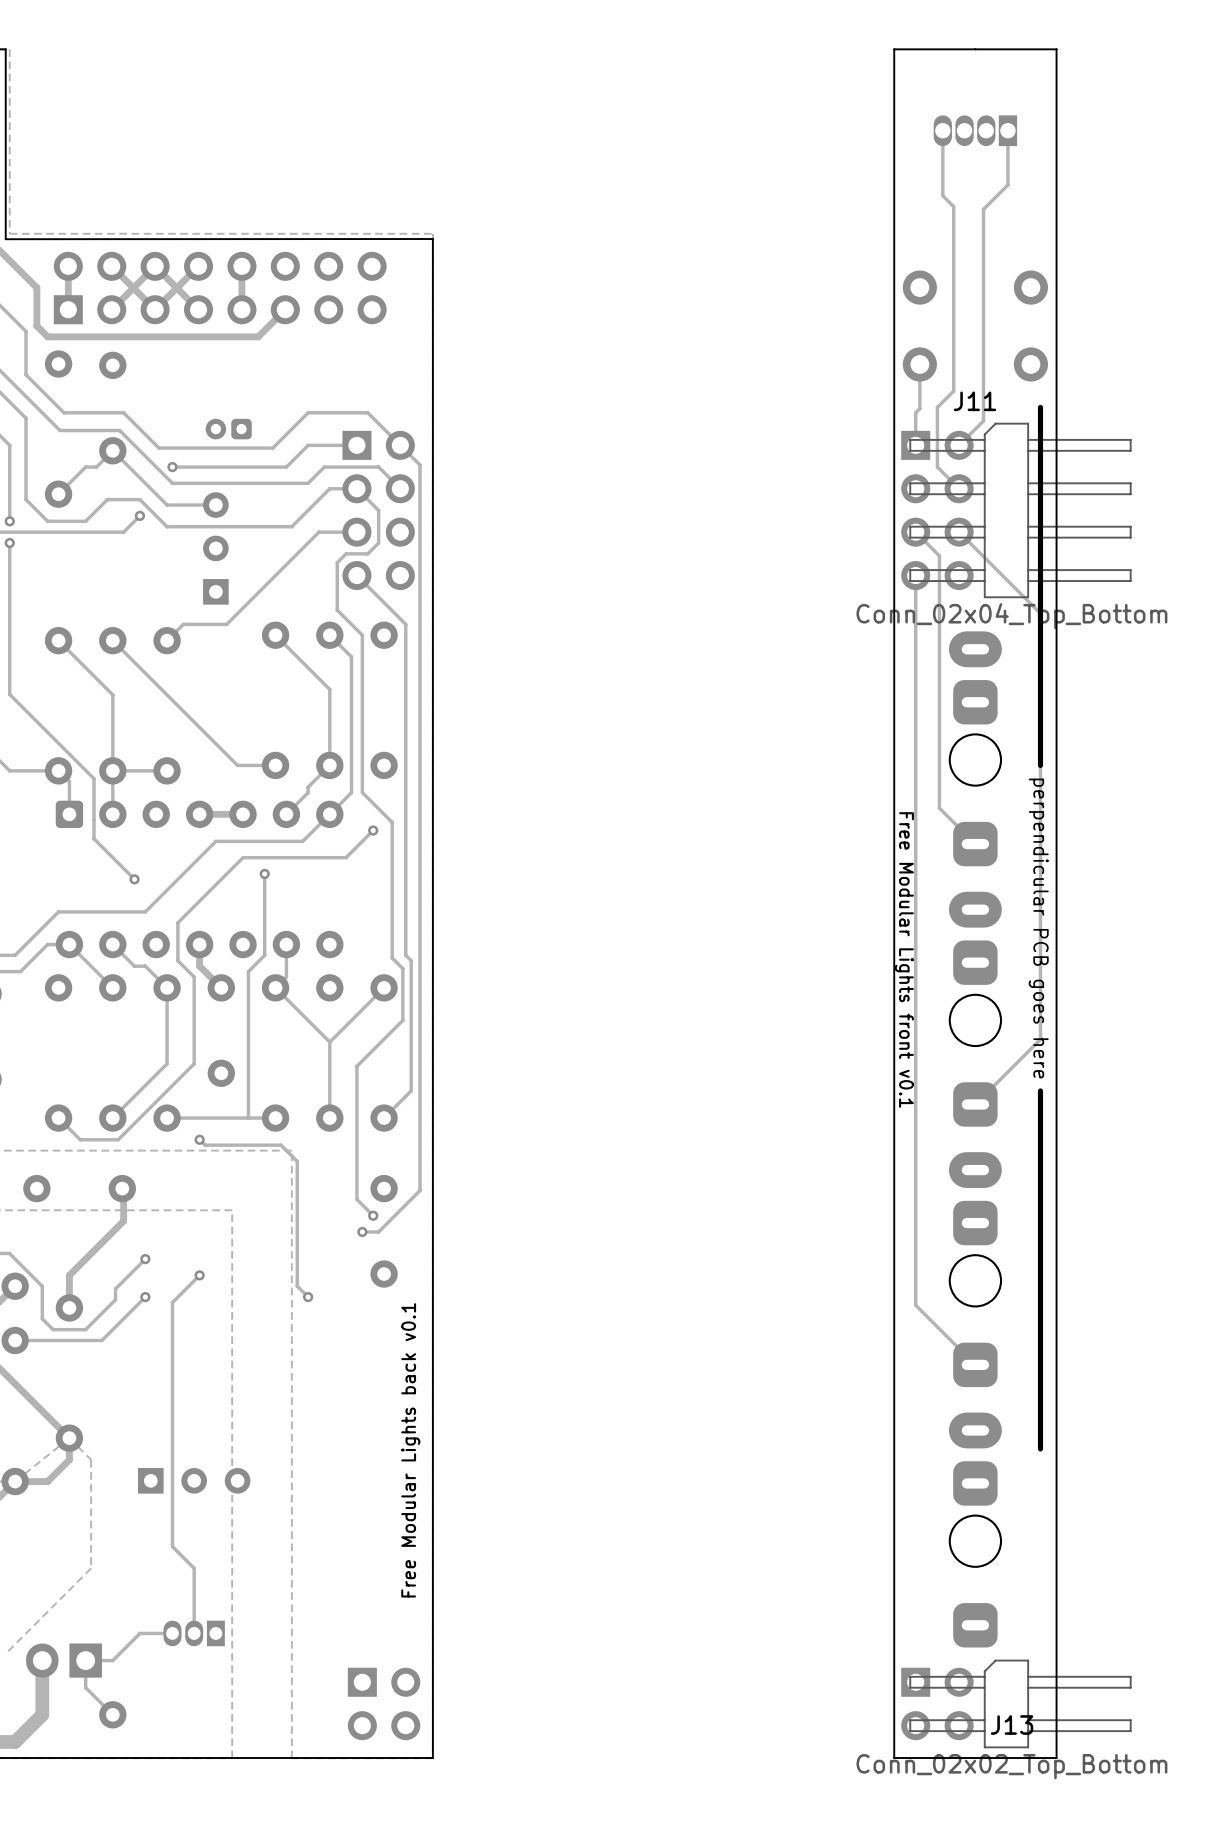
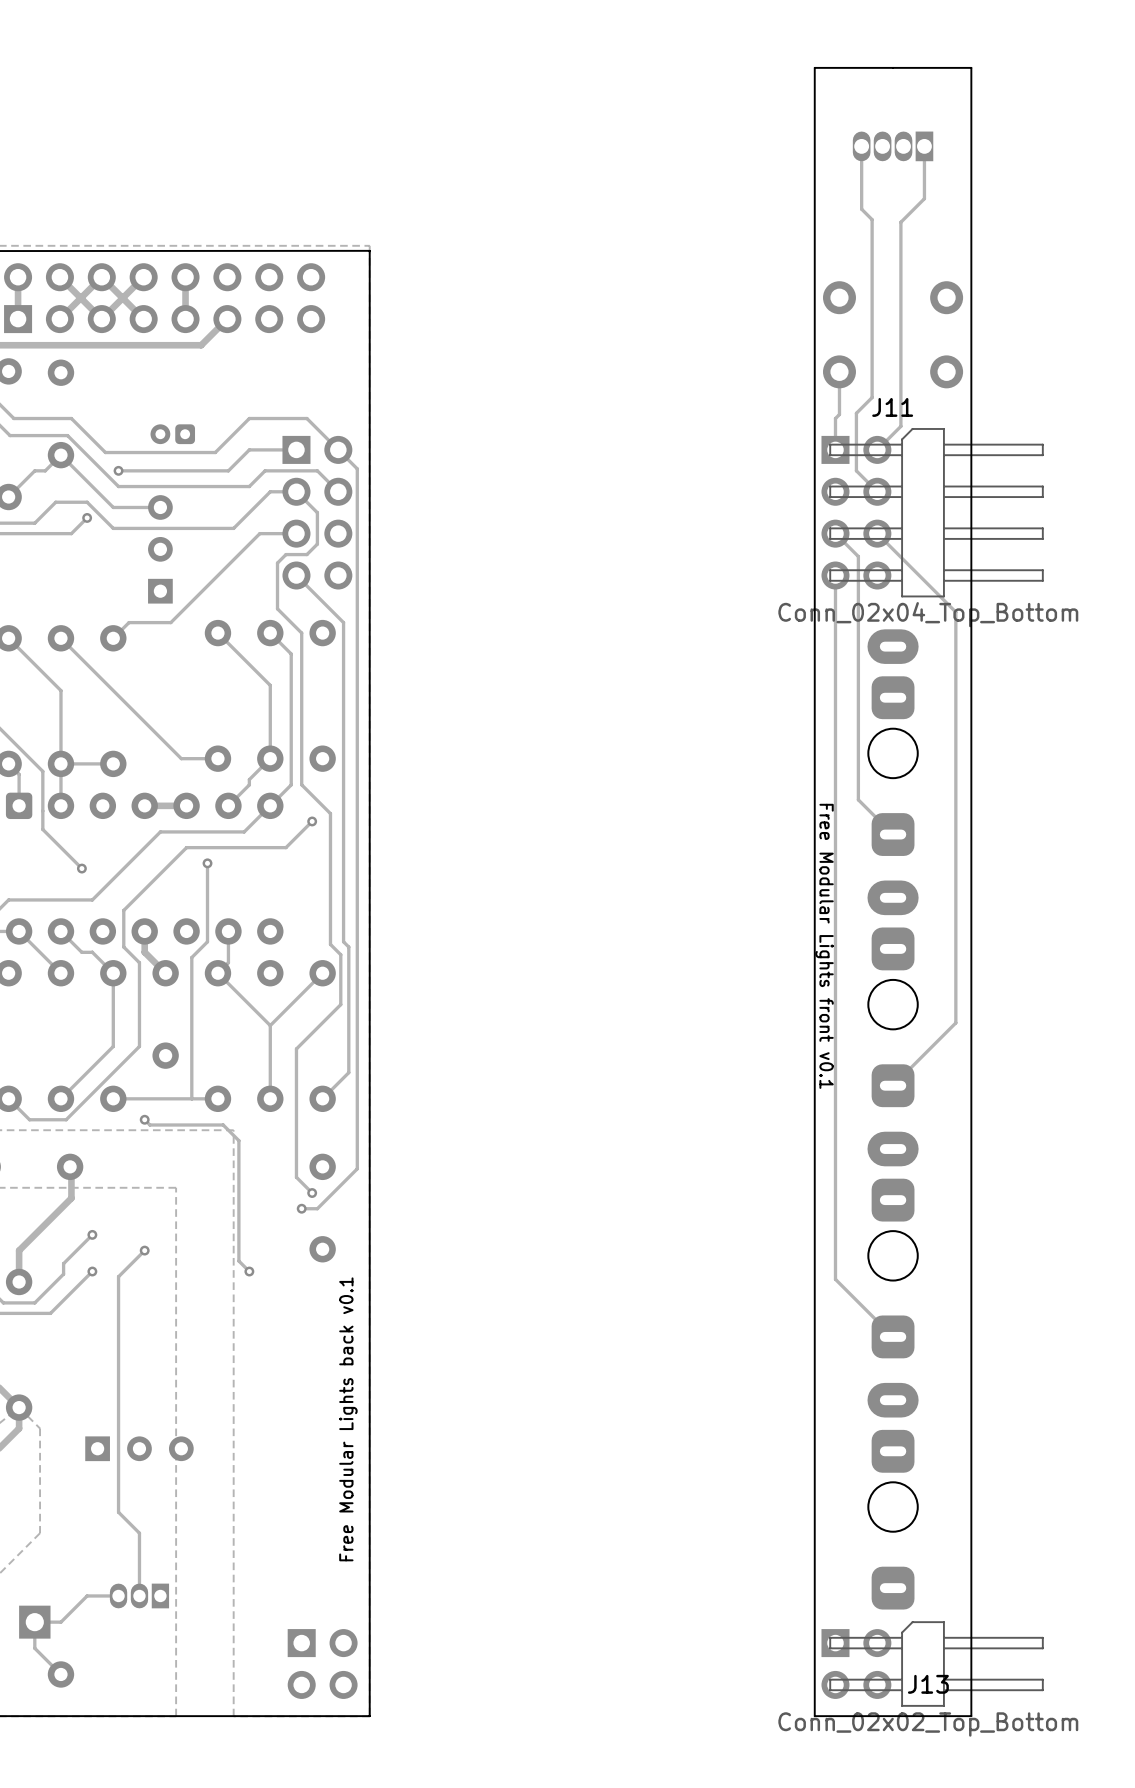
line: (1040, 407) (1040, 765) -> none
text: perpendicular PCB goes here (1038, 928) -> none
line: (1040, 1090) (1040, 1448) -> none

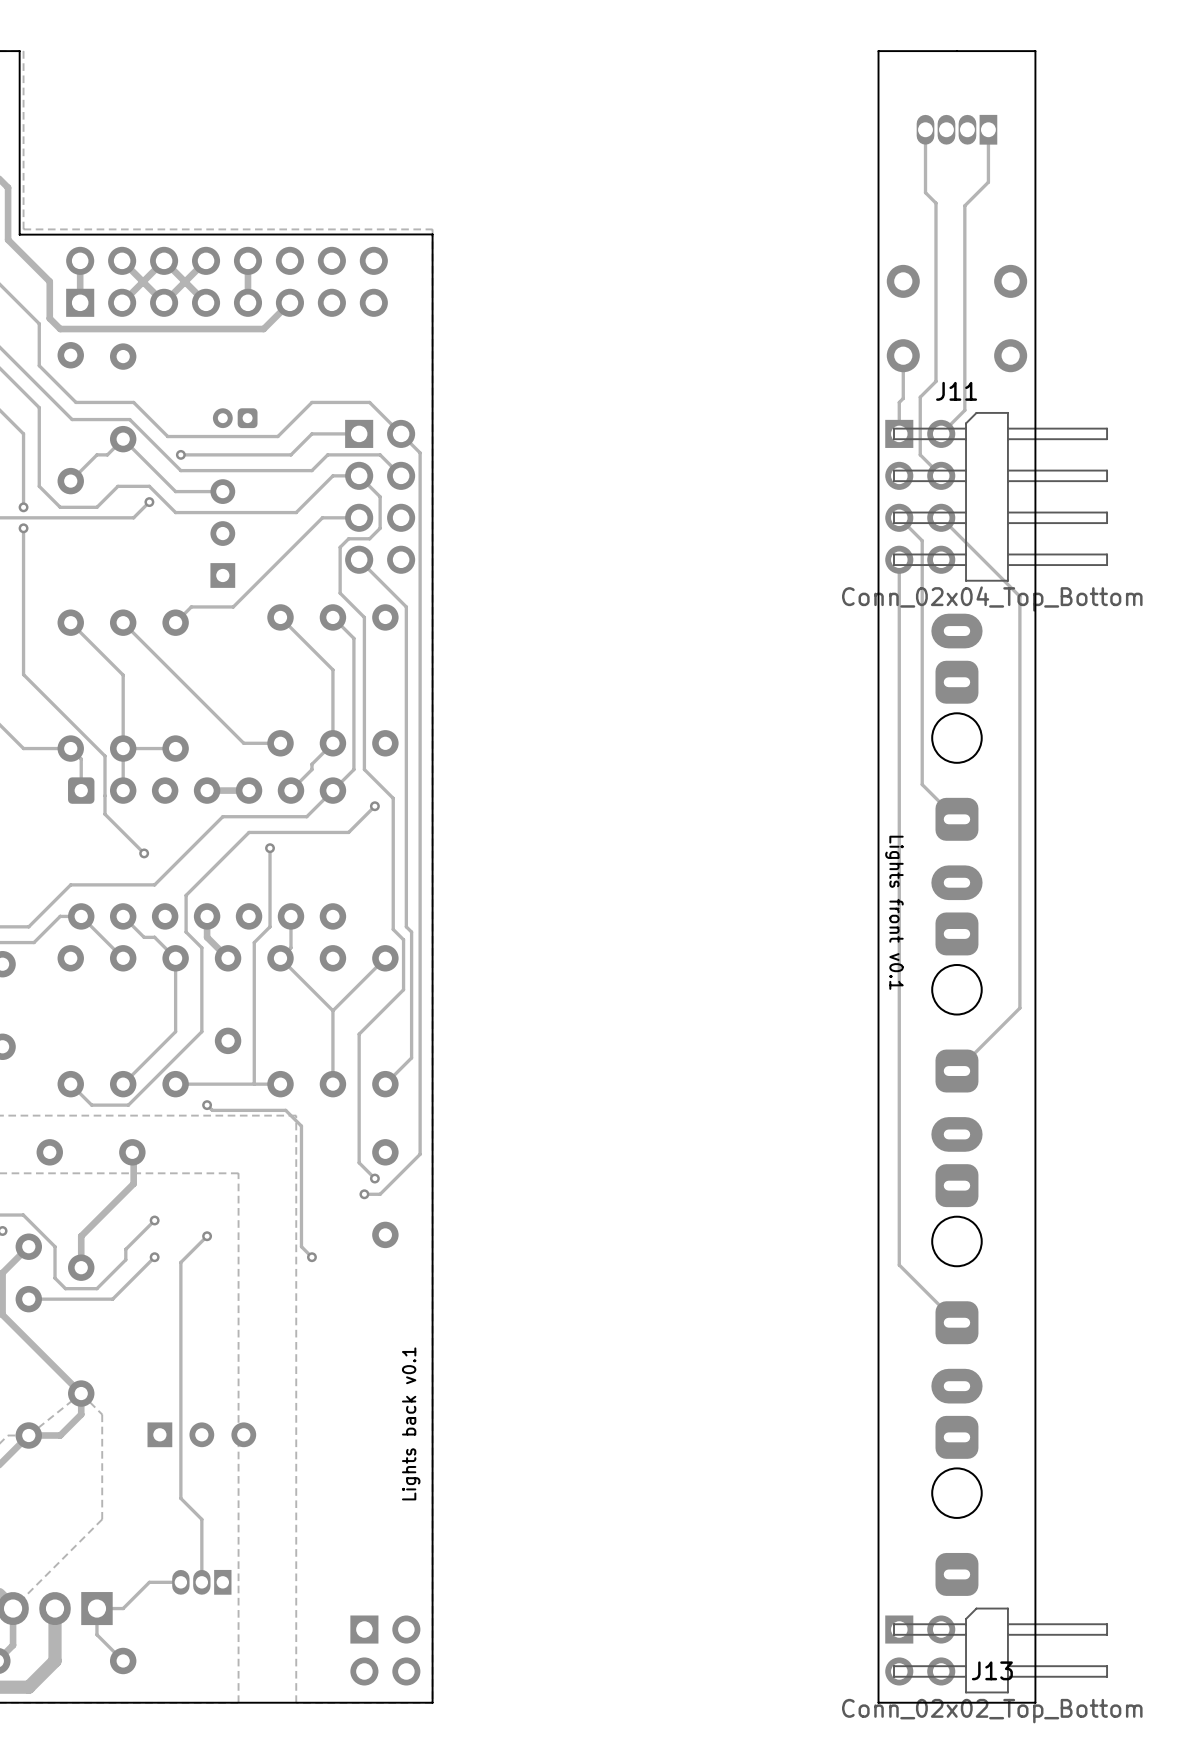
text: Free Modular Lights front v0.1 (824, 946) -> Lights front v0.1 (894, 912)
text: Free Modular Lights back v0.1 (348, 1419) -> Lights back v0.1 (411, 1423)

